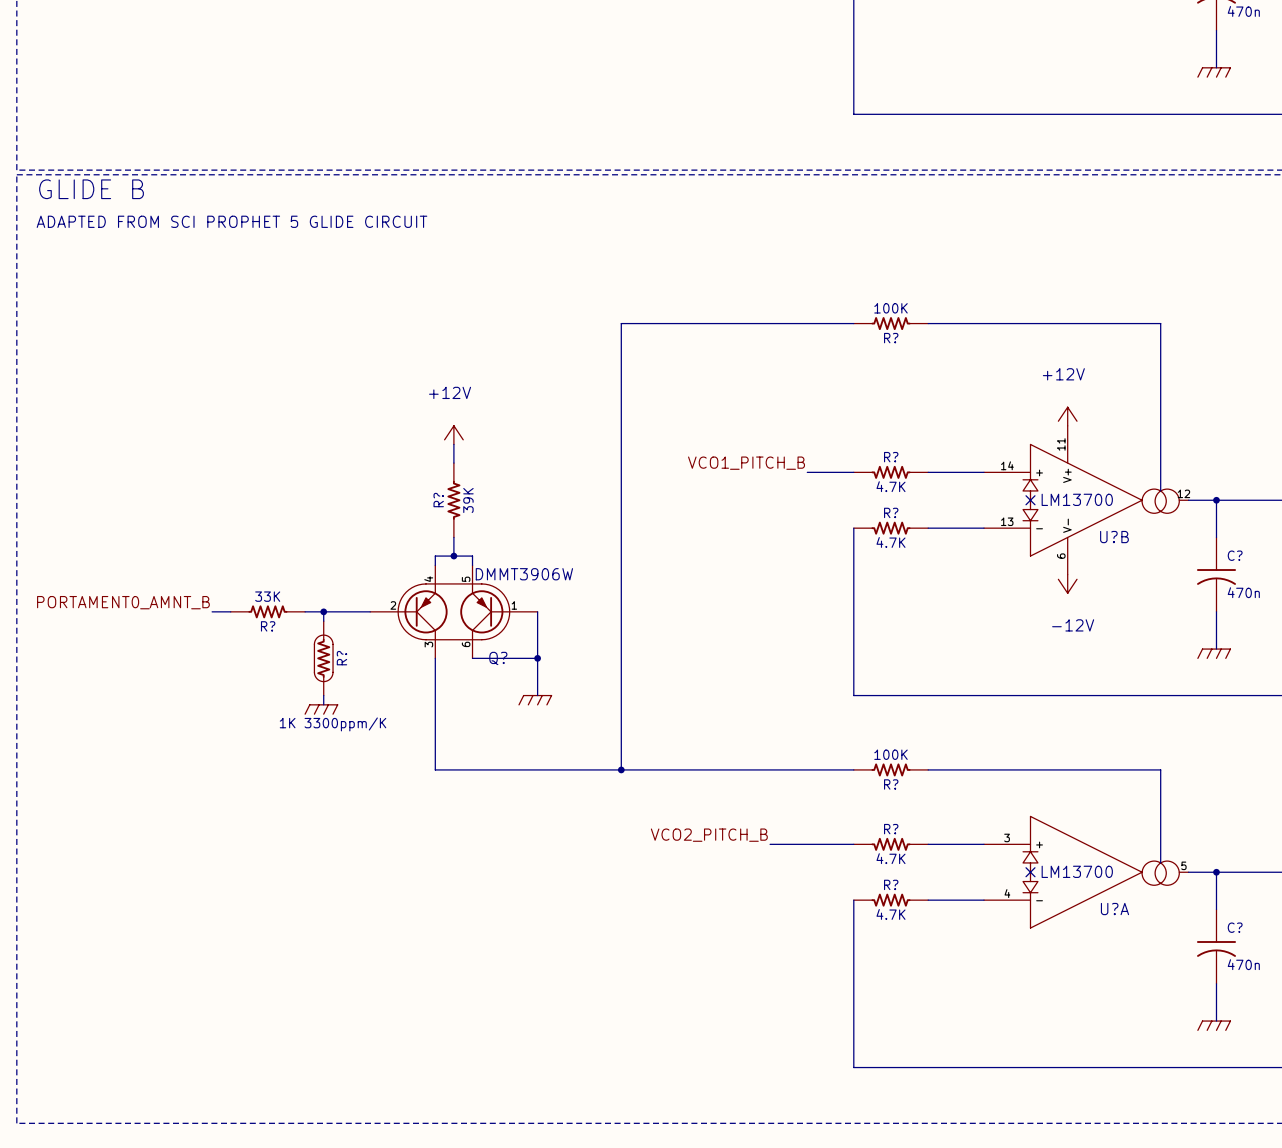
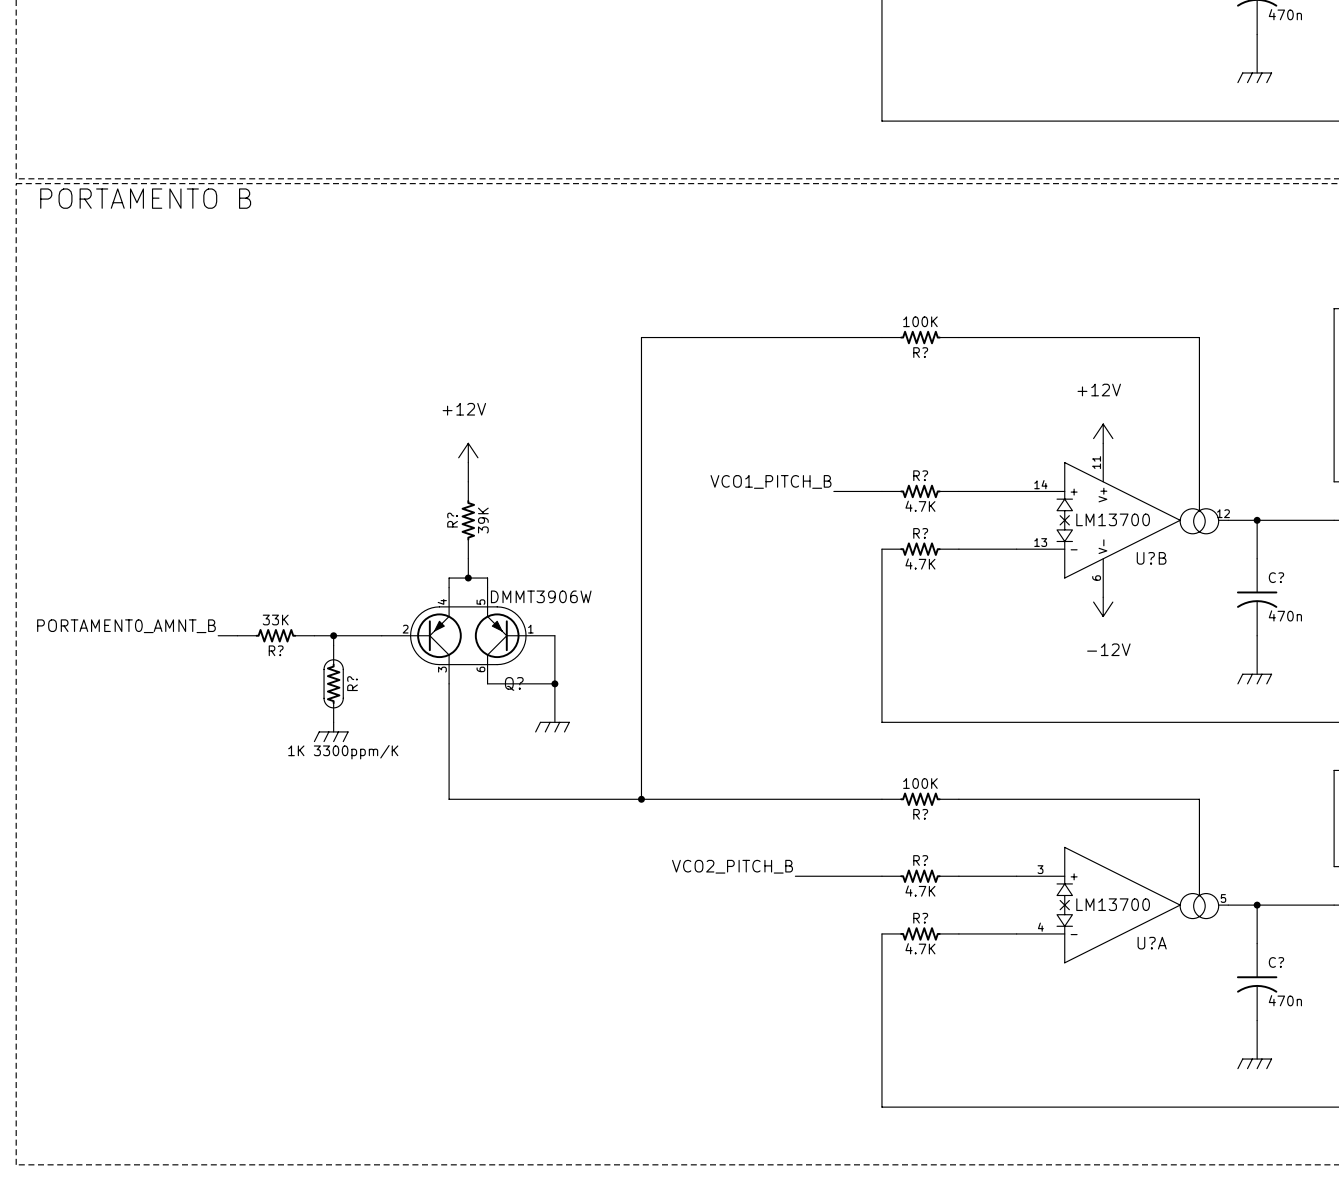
text: GLIDE B (91, 189) -> PORTAMENTO B (145, 198)
text: ADAPTED FROM SCI PROPHET 5 GLIDE CIRCUIT (231, 221) -> none

